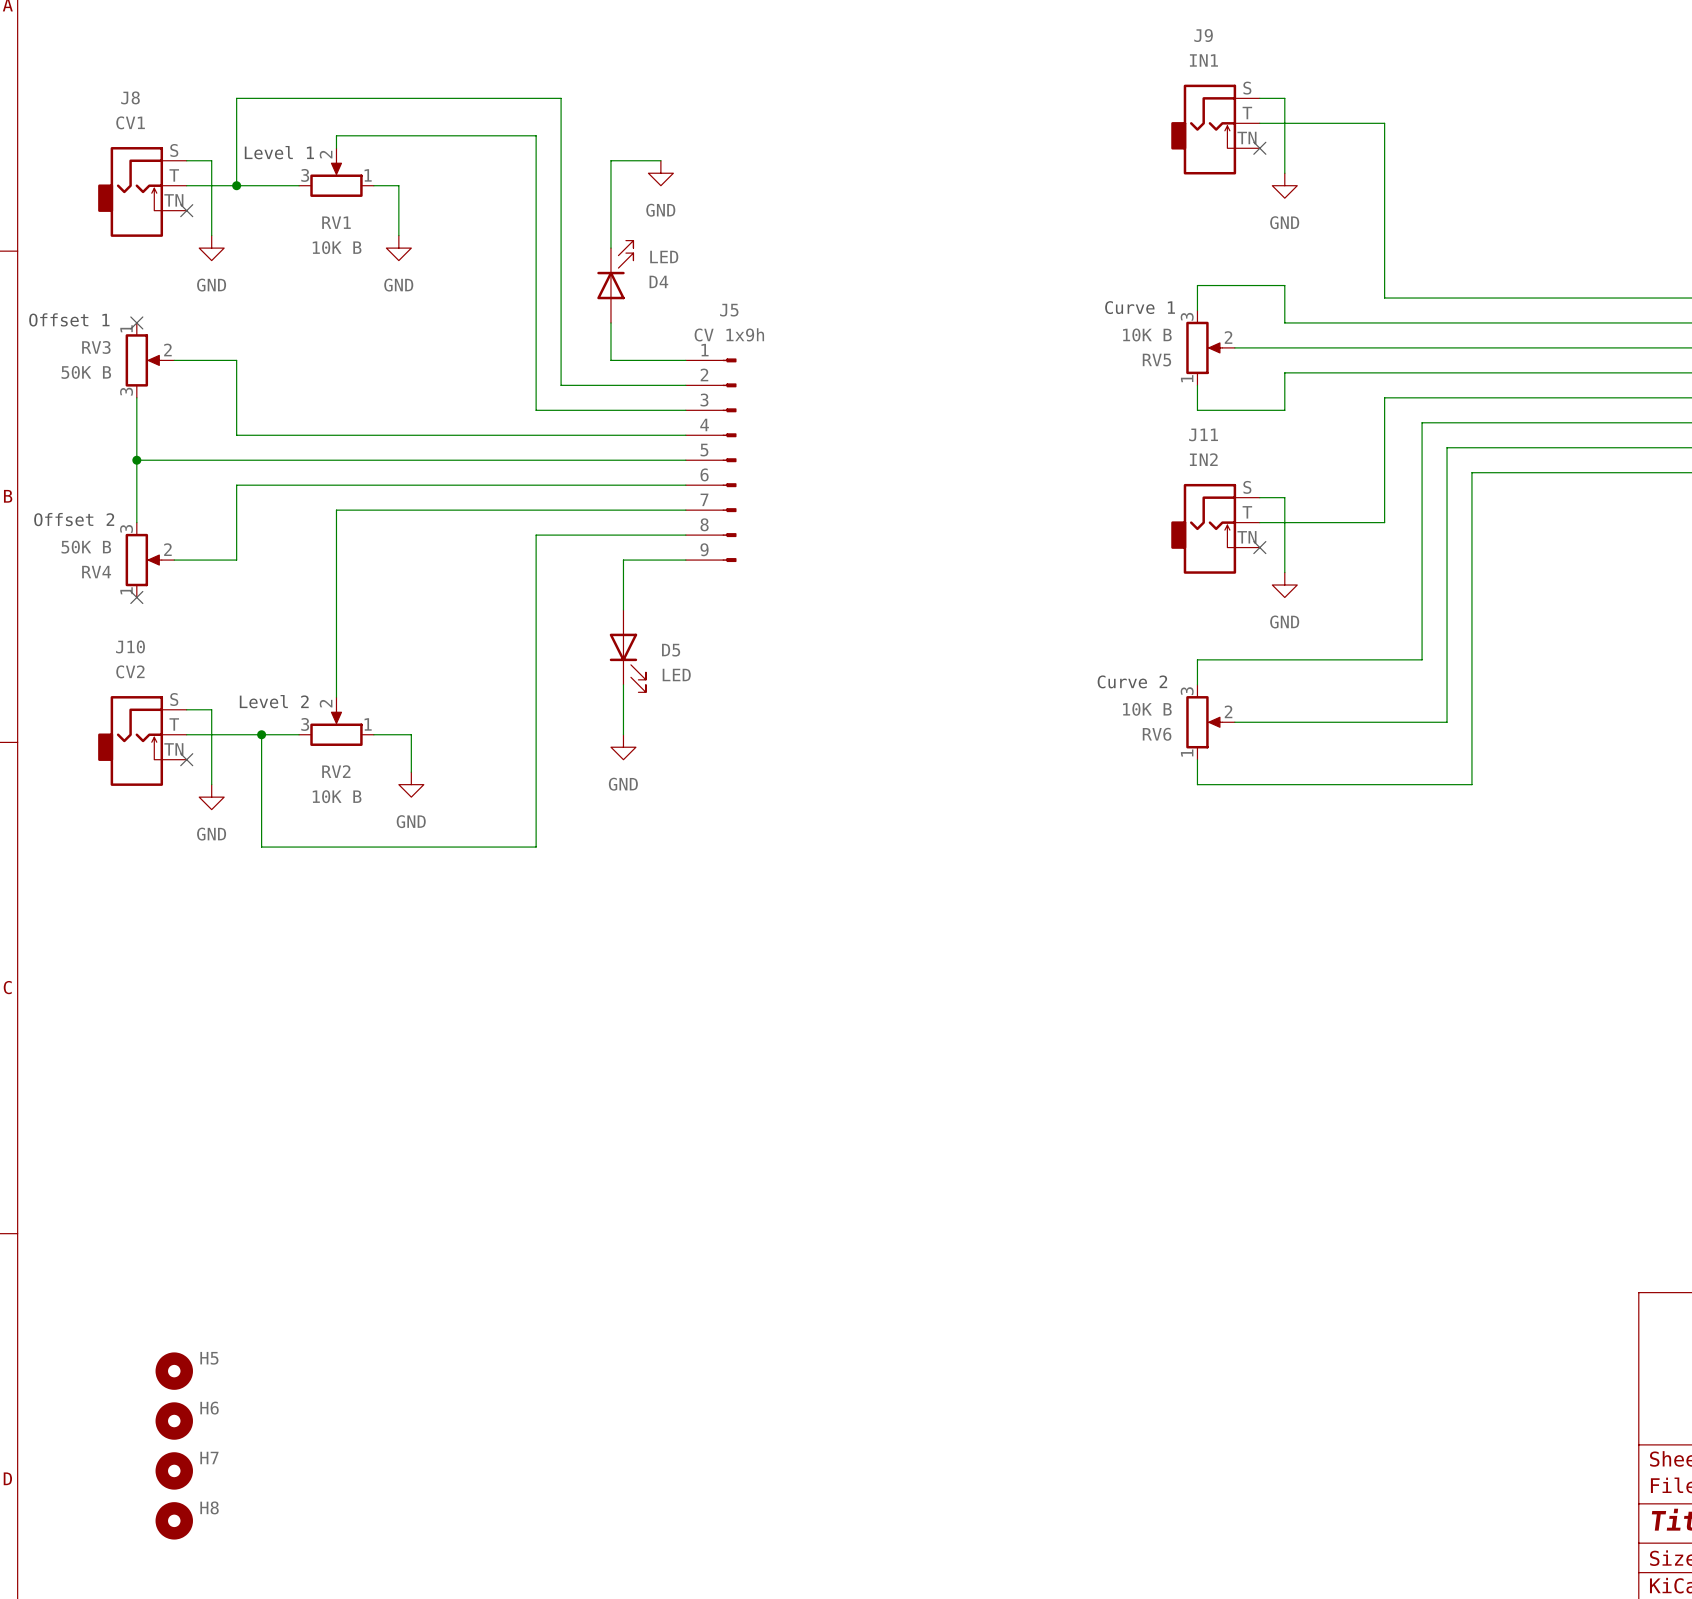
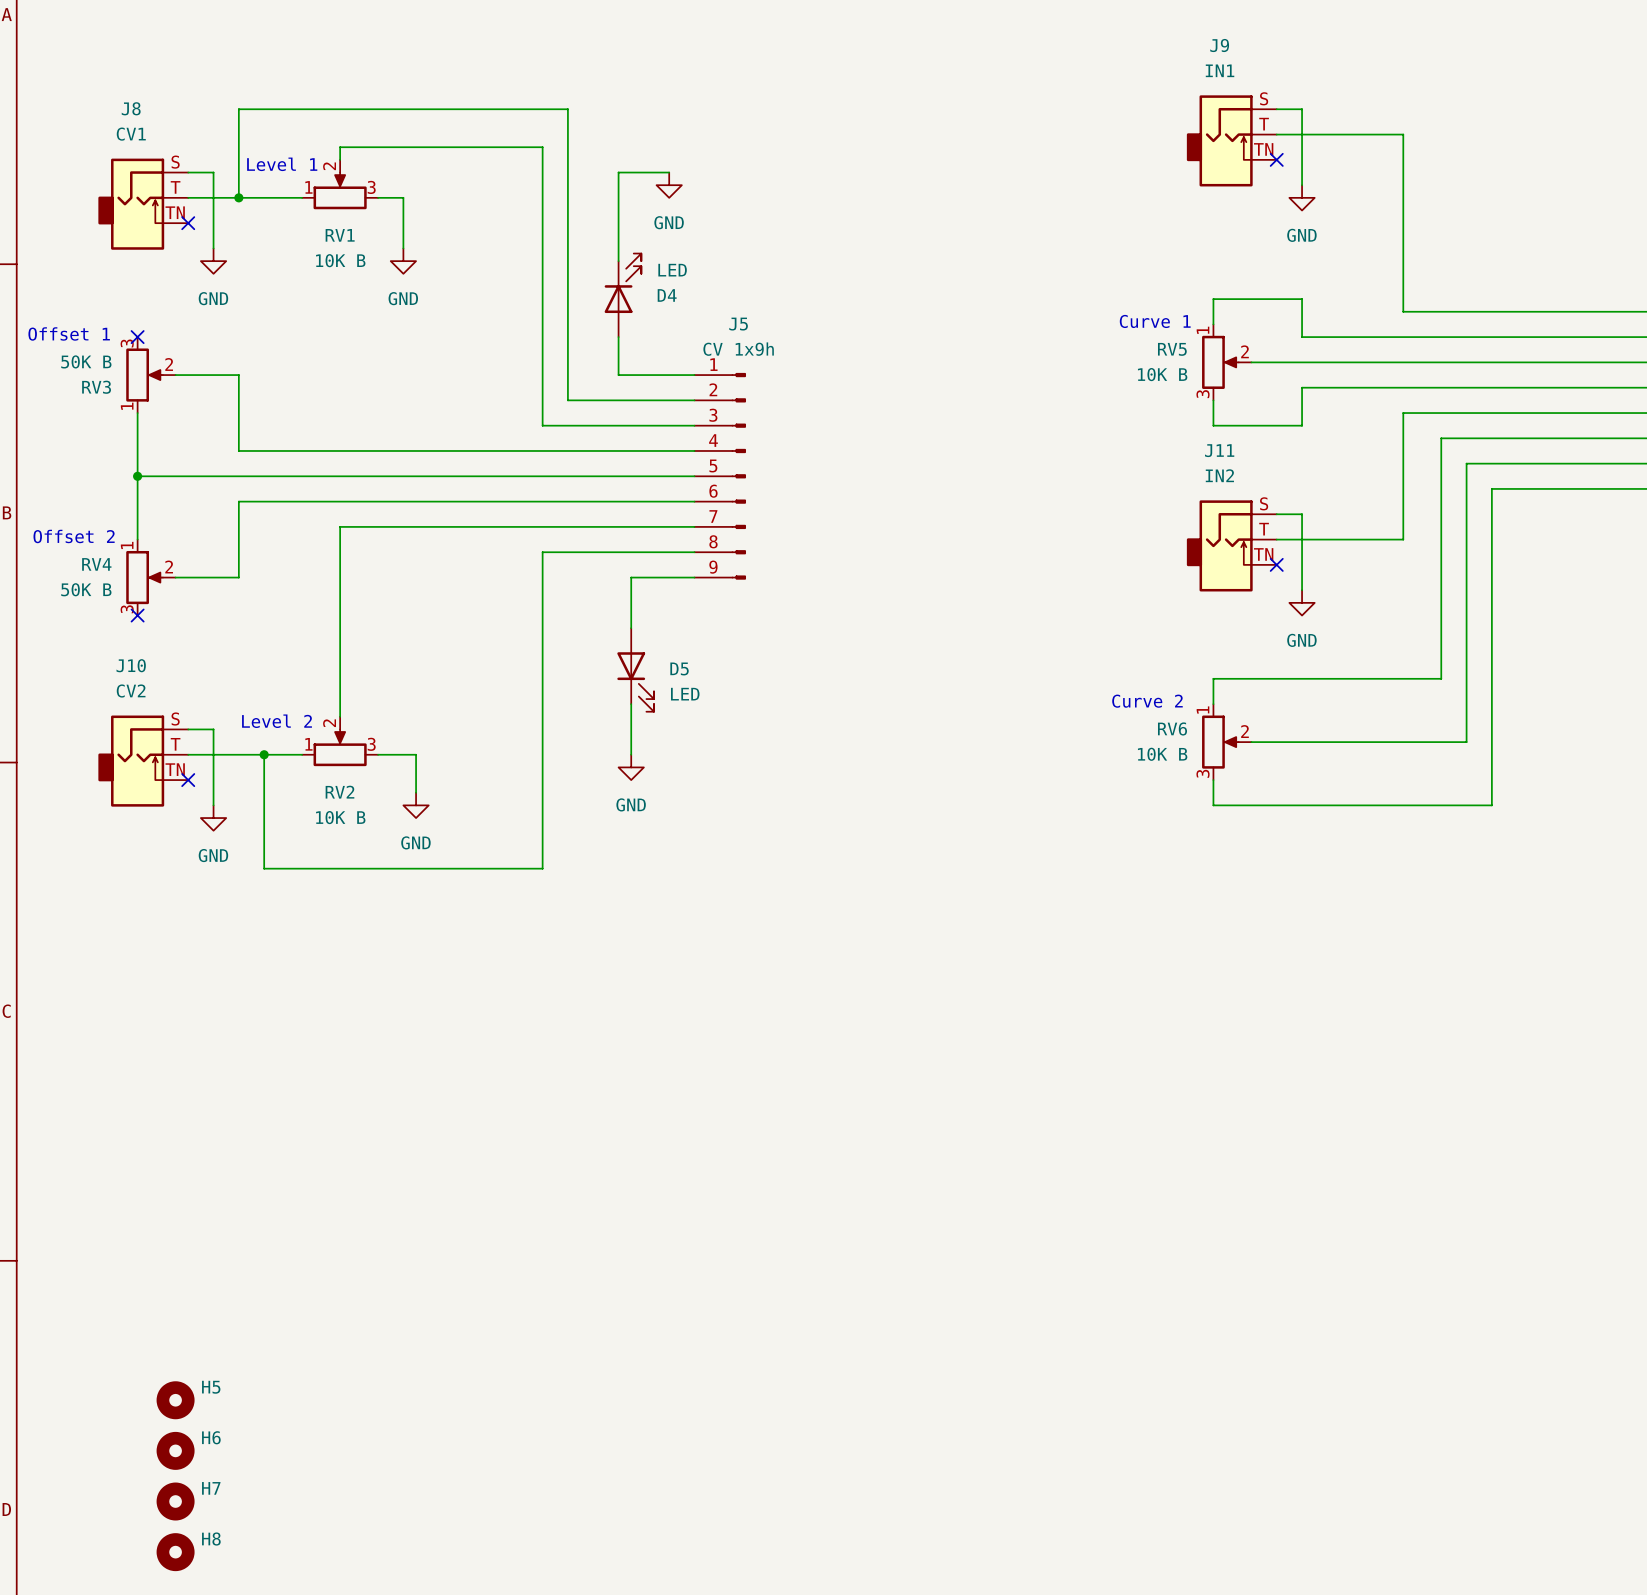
RV1 flip: as is (336, 178) -> left-right (340, 190)
RV5 flip: as is (1204, 347) -> up-down (1220, 362)
RV3 flip: as is (143, 360) -> up-down (144, 375)
RV4 flip: as is (143, 560) -> up-down (144, 577)
RV6 flip: as is (1204, 722) -> up-down (1220, 742)
RV2 flip: as is (336, 727) -> left-right (340, 747)

